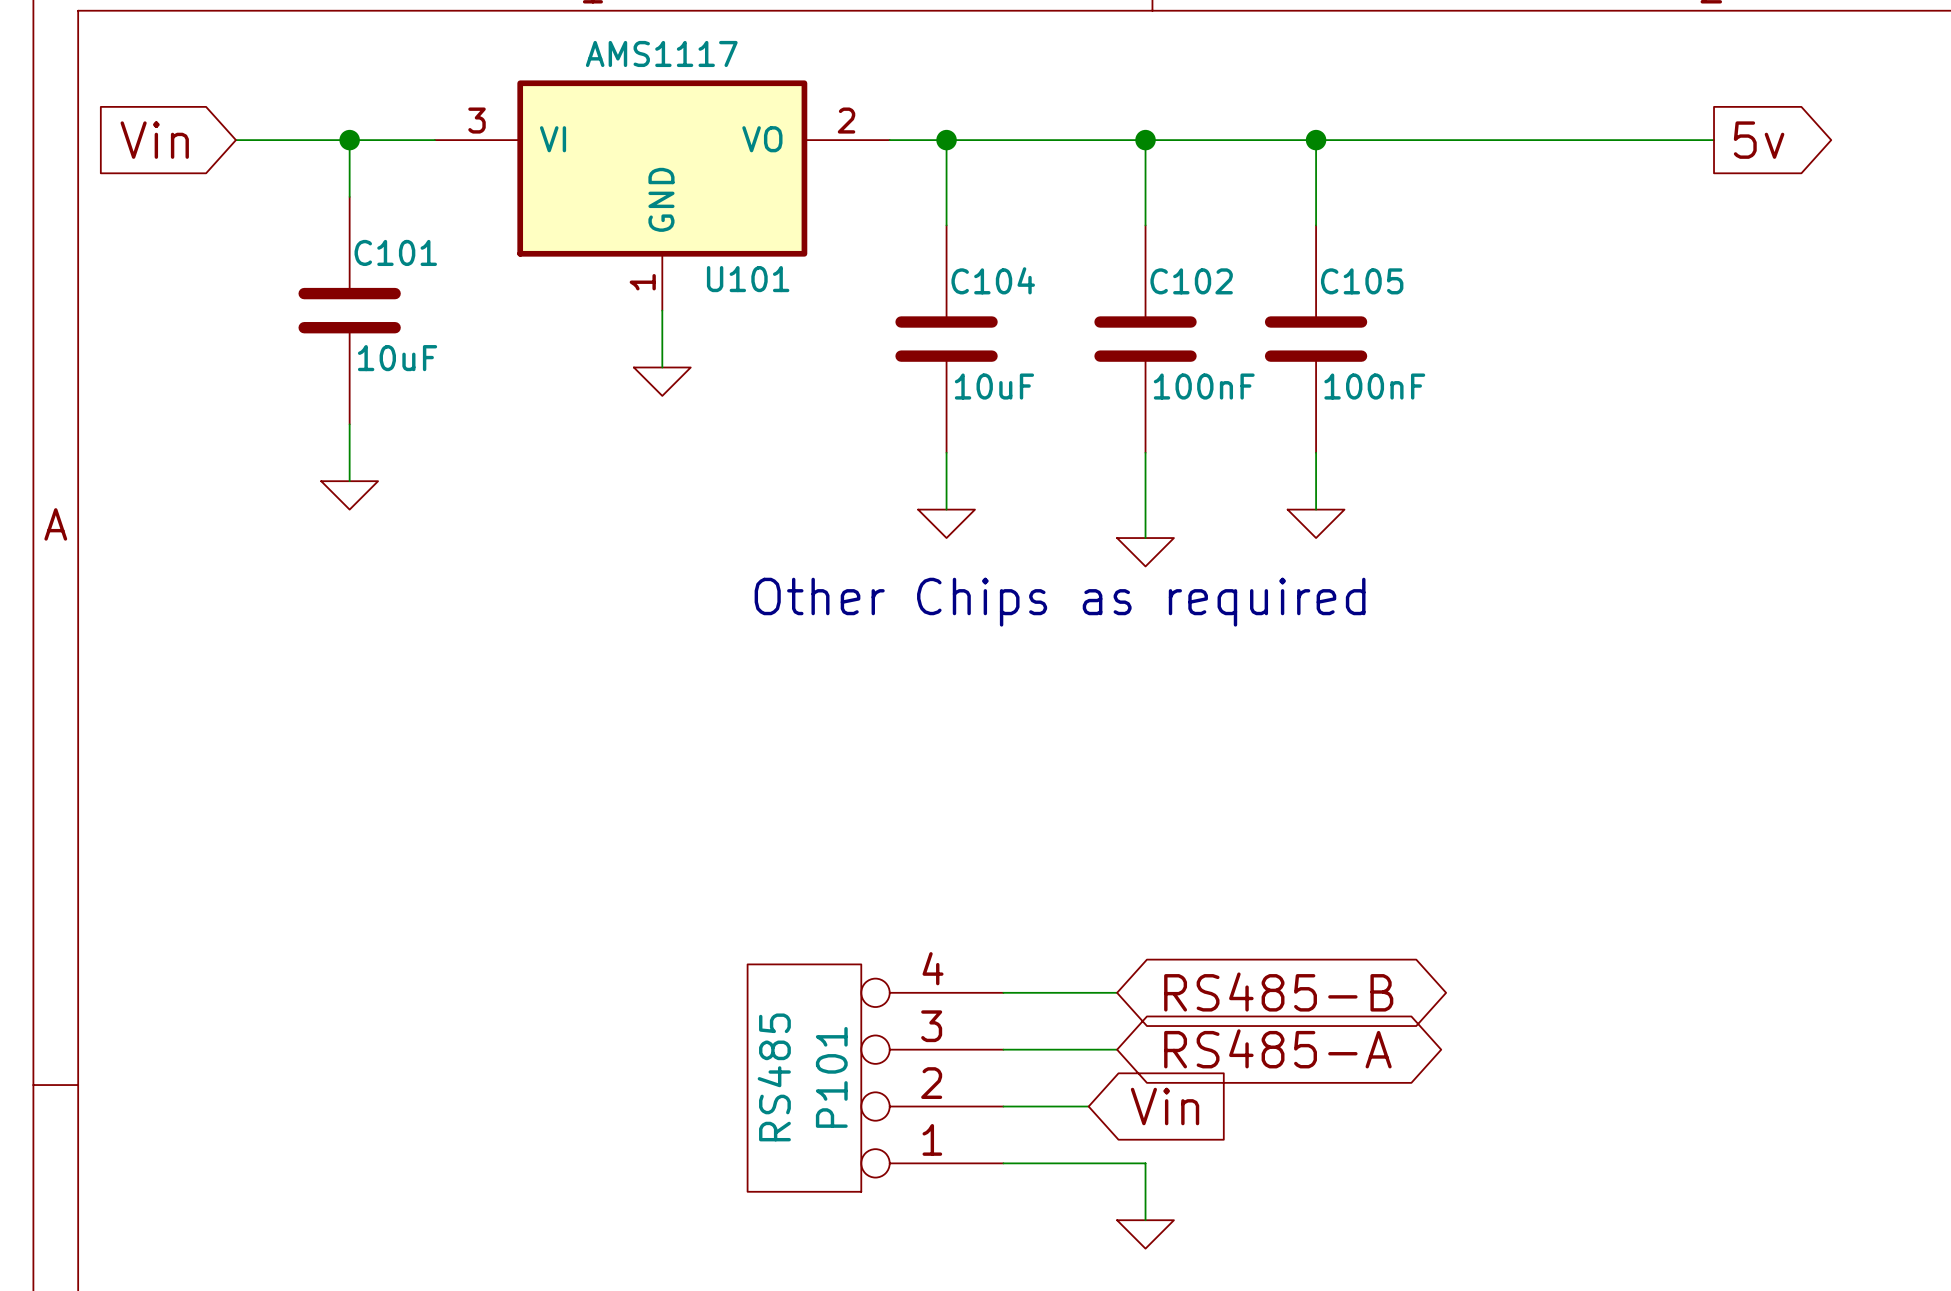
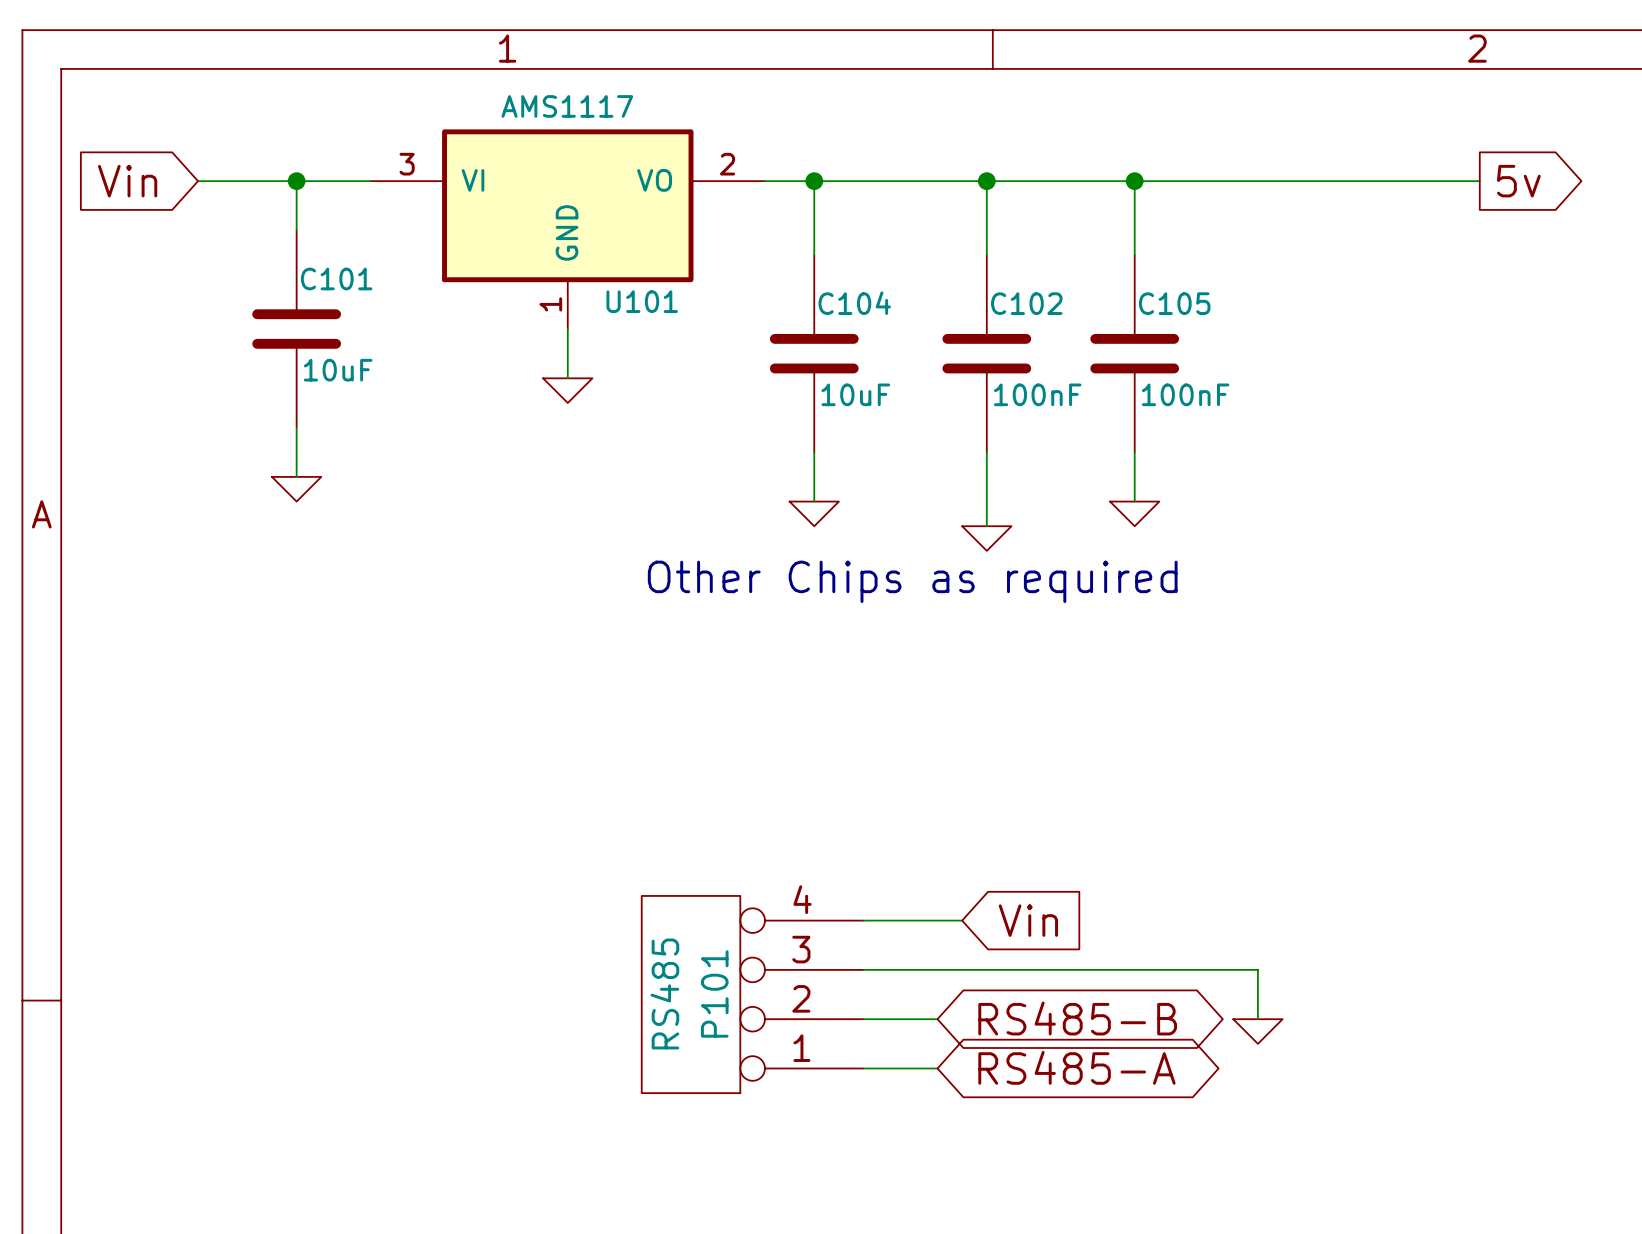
global label shape: bidirectional (1278, 992) -> input (1028, 920)
global label: RS485-B (1278, 992) -> Vin (1028, 920)
global label position: RS485-A (1277, 1048) -> RS485-A (1076, 1067)
wire: none -> (962, 969) (1257, 969) (1257, 1019)
global label shape: input (1165, 1106) -> bidirectional (1077, 1018)
global label: Vin (1165, 1106) -> RS485-B (1077, 1018)
wire: (1088, 1163) (1145, 1163) (1145, 1220) -> none
power symbol position: (1145, 1234) -> (1257, 1031)

